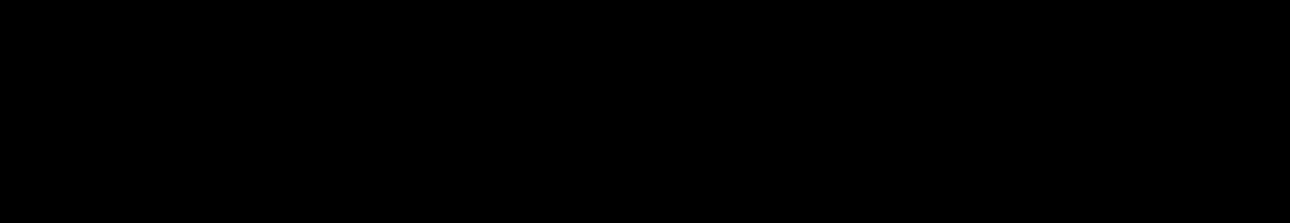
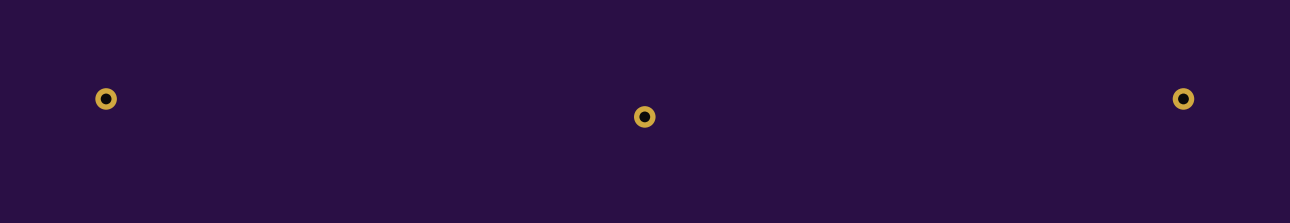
via: none -> (106, 98)
via: none -> (1183, 98)
via: none -> (644, 116)

